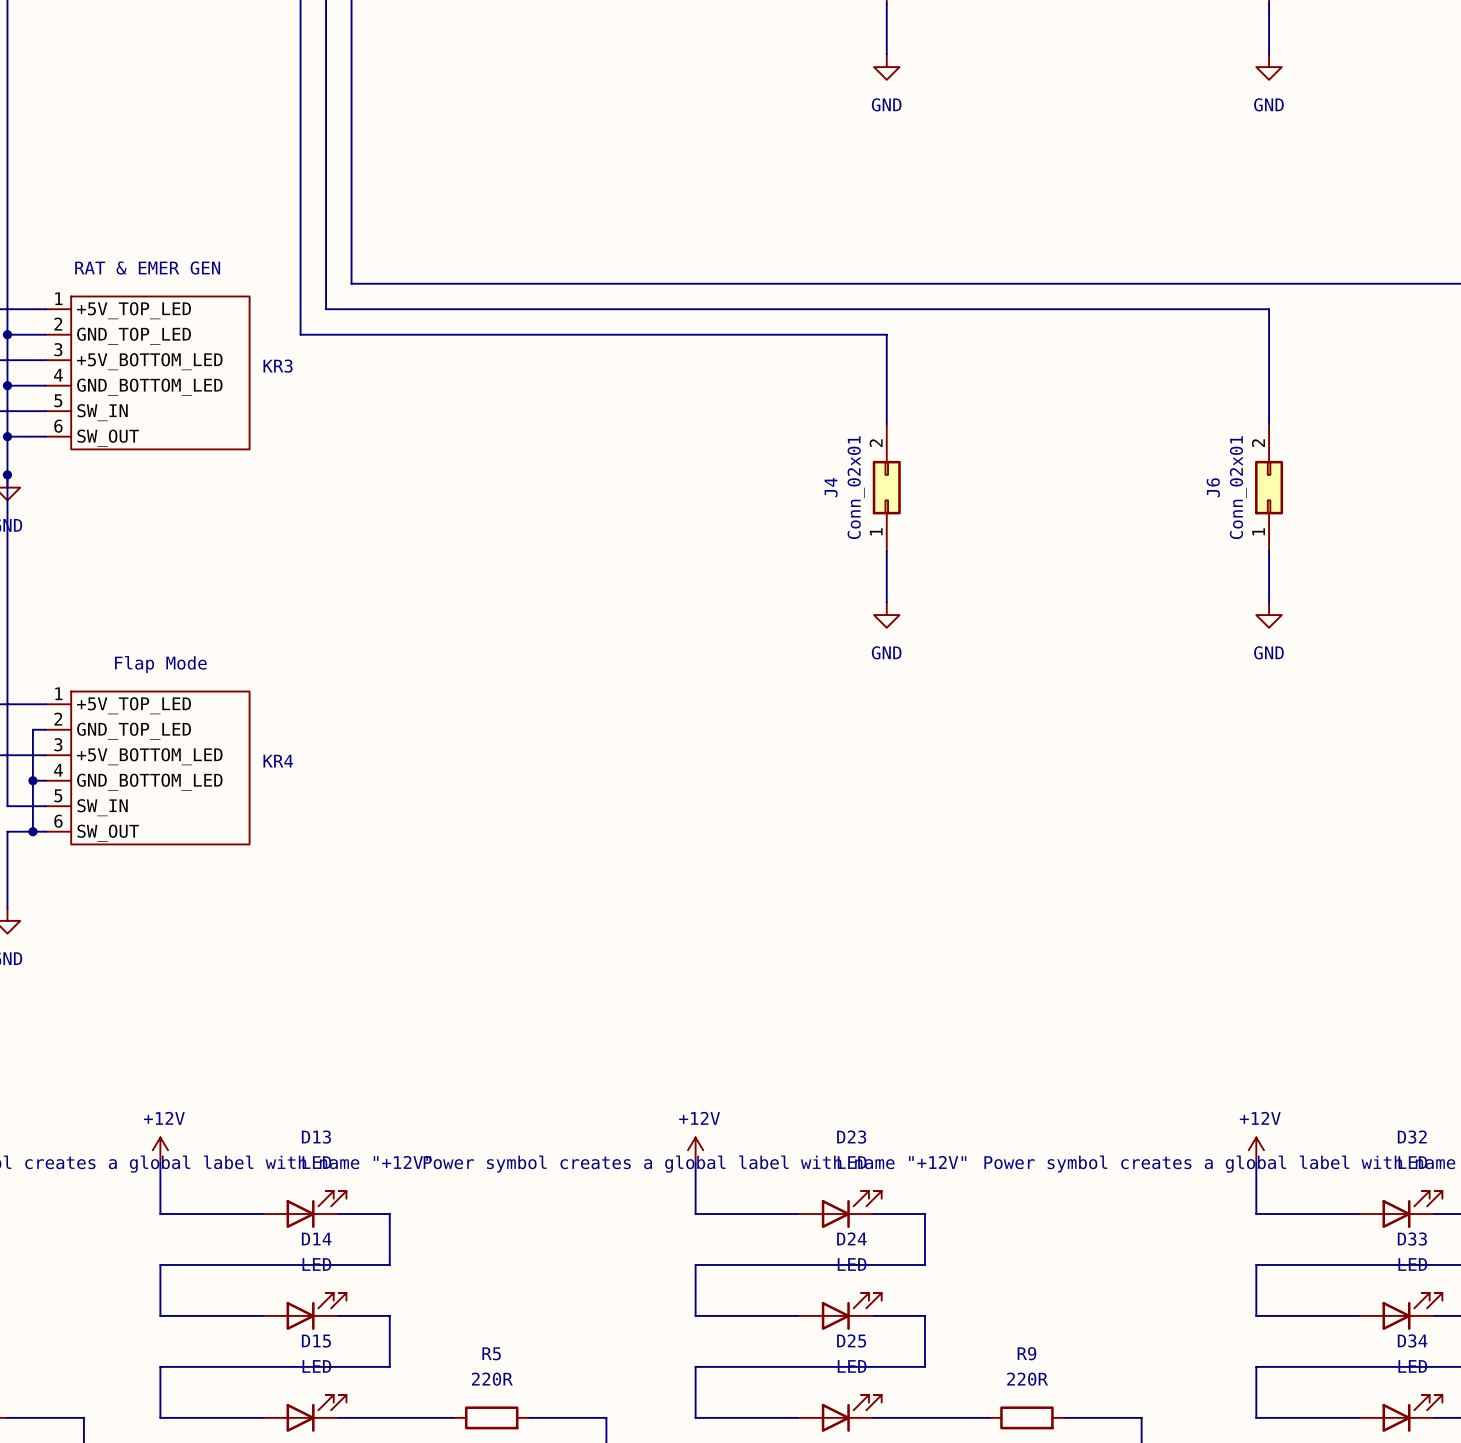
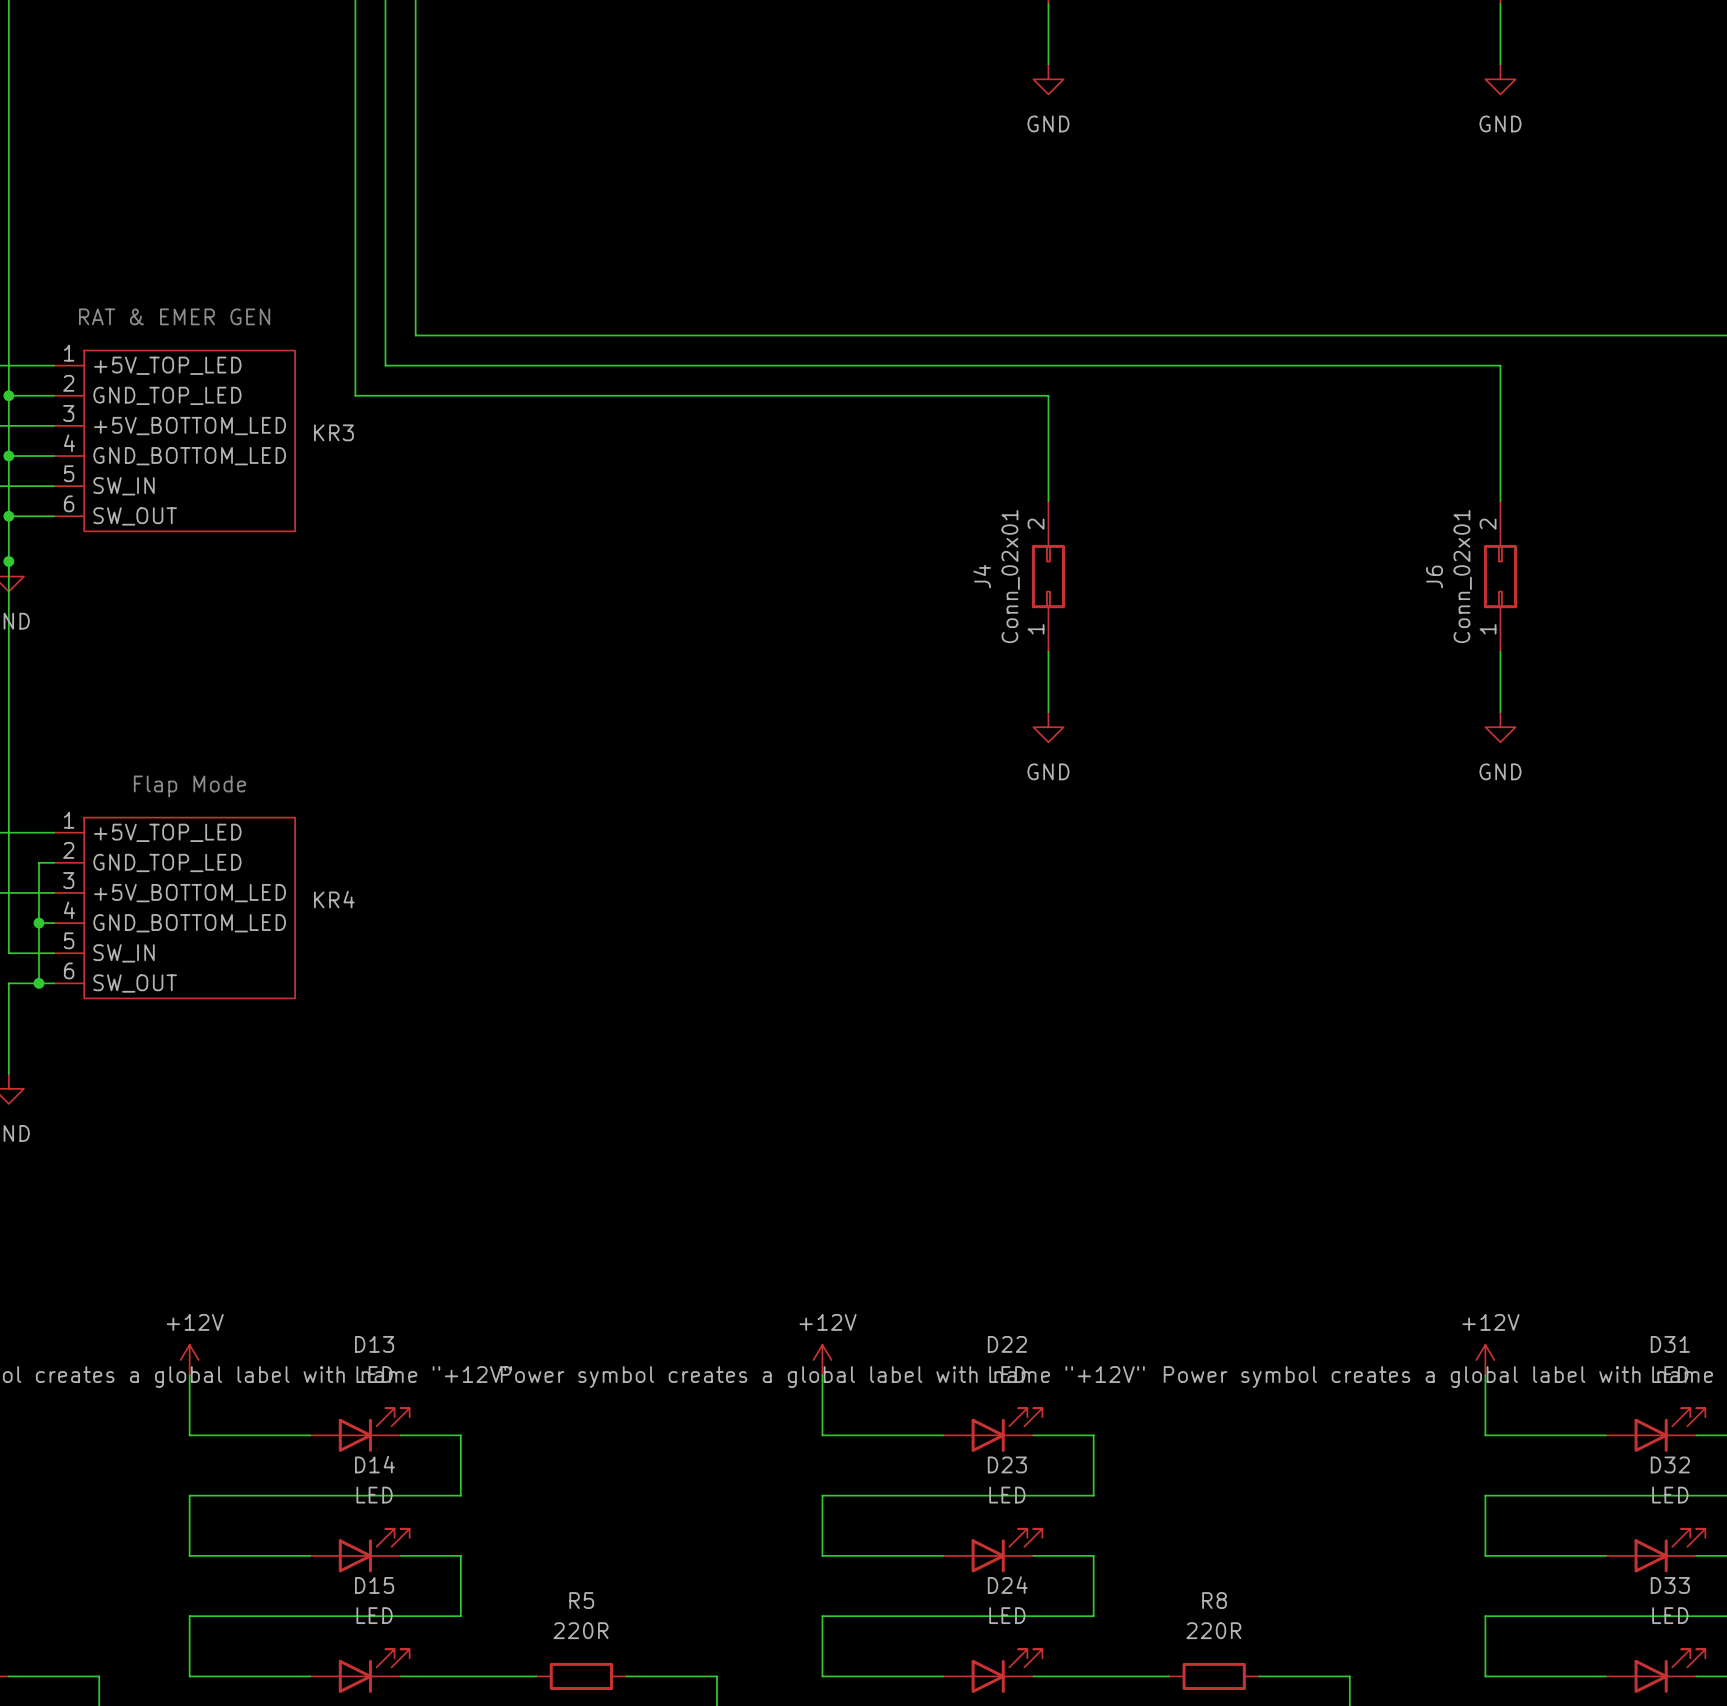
D23 name: D23 (851, 1137) -> D22 (1007, 1344)
D32 name: D32 (1412, 1137) -> D31 (1670, 1344)
D24 name: D24 (851, 1238) -> D23 (1007, 1464)
D33 name: D33 (1412, 1239) -> D32 (1670, 1464)
D25 name: D25 (851, 1340) -> D24 (1007, 1585)
D34 name: D34 (1412, 1340) -> D33 (1670, 1585)
R9 name: R9 (1026, 1353) -> R8 (1214, 1600)

